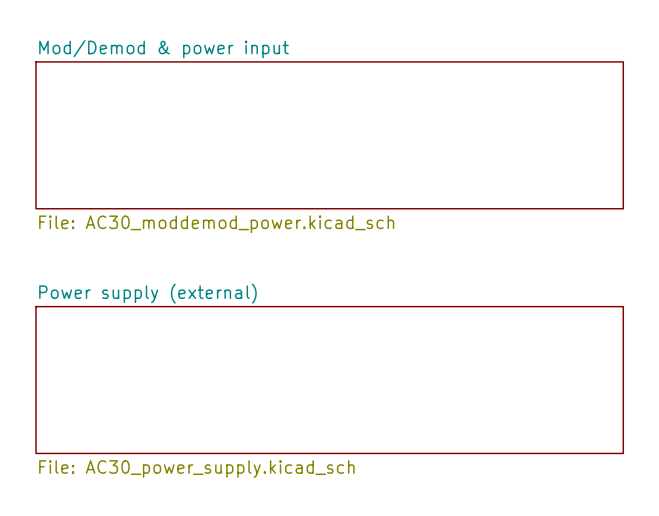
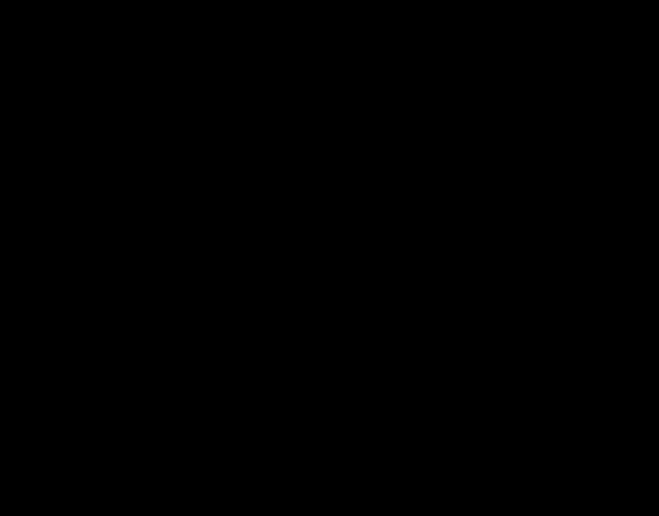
sheet Mod/Demod & power input: File: AC30_moddemod_power.kicad_sch (329, 135) -> none
sheet Power supply (external): File: AC30_power_supply.kicad_sch (329, 380) -> none

